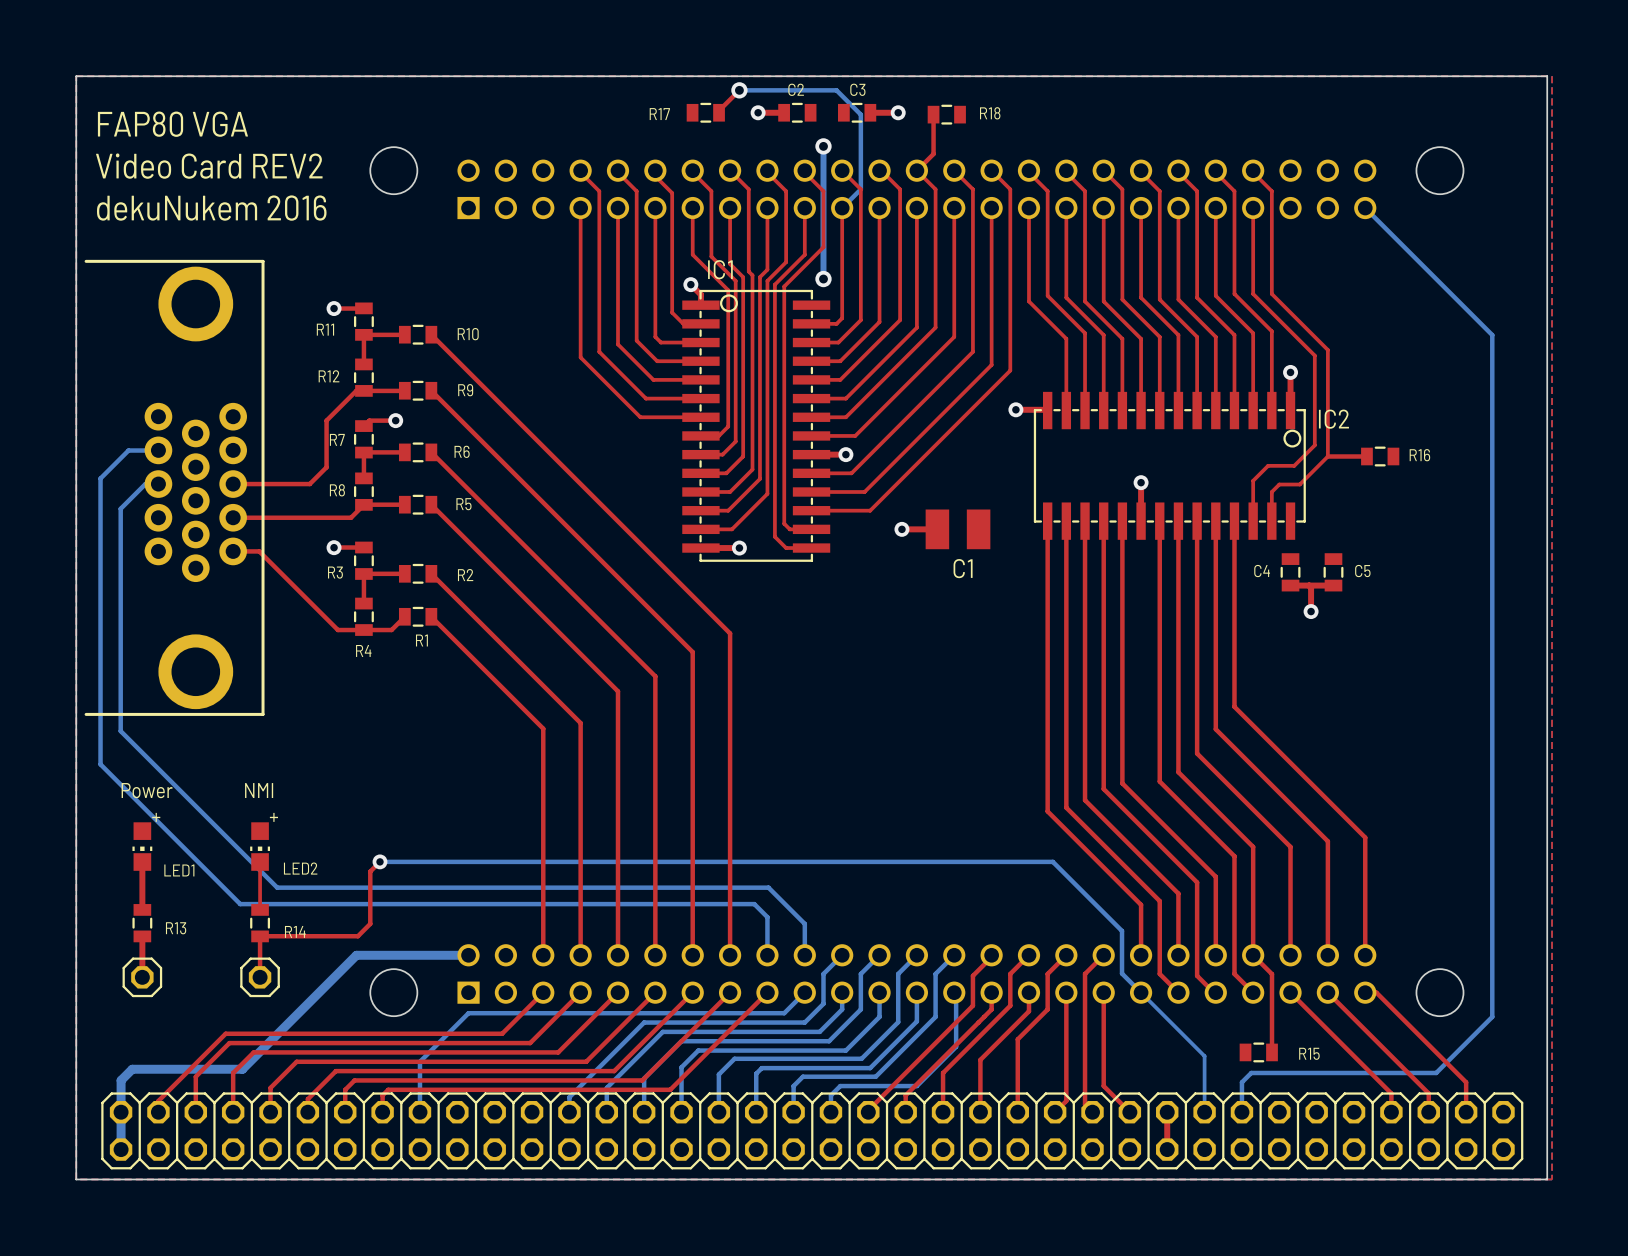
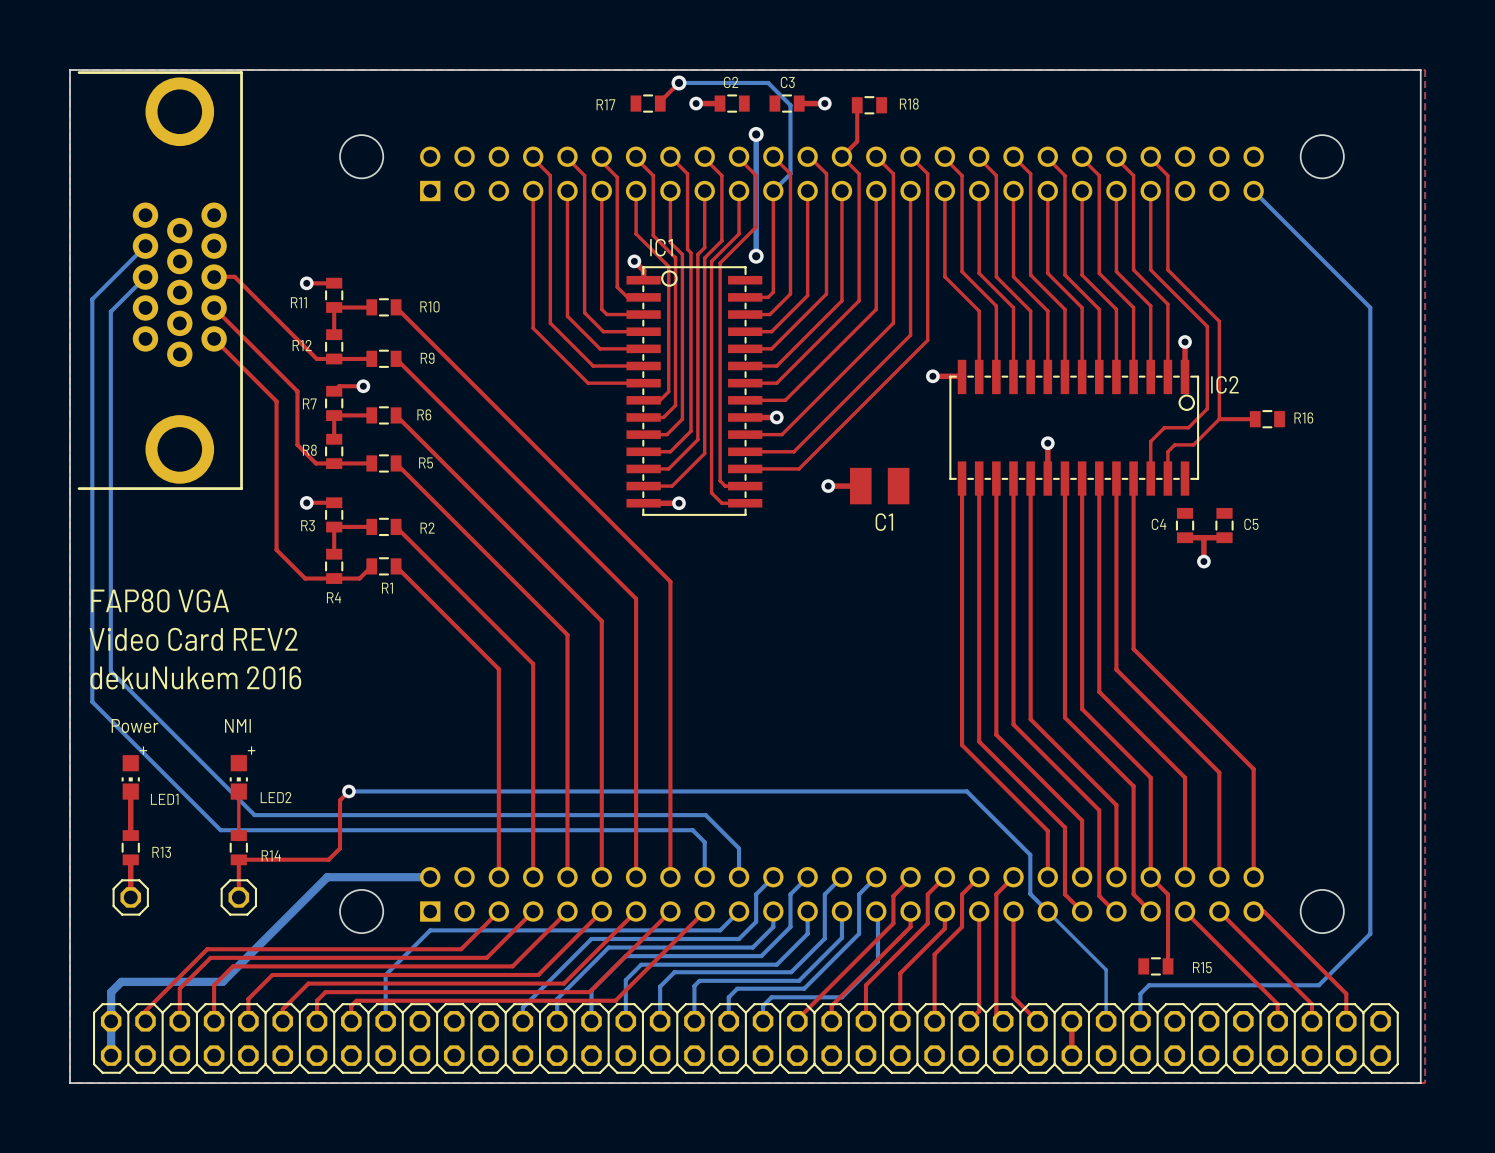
text: FAP80 VGA (172, 124) -> none
text: Video Card REV2 (209, 166) -> none
text: dekuNukem 2016 (211, 208) -> none
top track: (356, 390) (326, 420) (326, 467) (309, 484) (233, 484) -> (327, 358) (316, 358) (234, 276) (214, 277)
bottom track: (158, 450) (128, 450) (100, 478) -> (145, 246) (92, 299) (92, 439)
bottom track: (158, 484) (145, 484) (120, 508) -> (145, 277) (110, 311) (110, 467)
part position: (174, 487) -> (160, 280)
top track: (363, 504) (351, 517) (233, 517) -> (334, 463) (316, 463) (297, 444) (297, 391) (214, 308)
top track: (233, 551) (259, 551) (337, 630) -> (214, 338) (276, 401) (276, 549) (305, 578) (310, 578)
text: none -> FAP80 VGA (160, 600)
text: none -> Video Card REV2 (193, 639)
text: none -> dekuNukem 2016 (195, 677)

